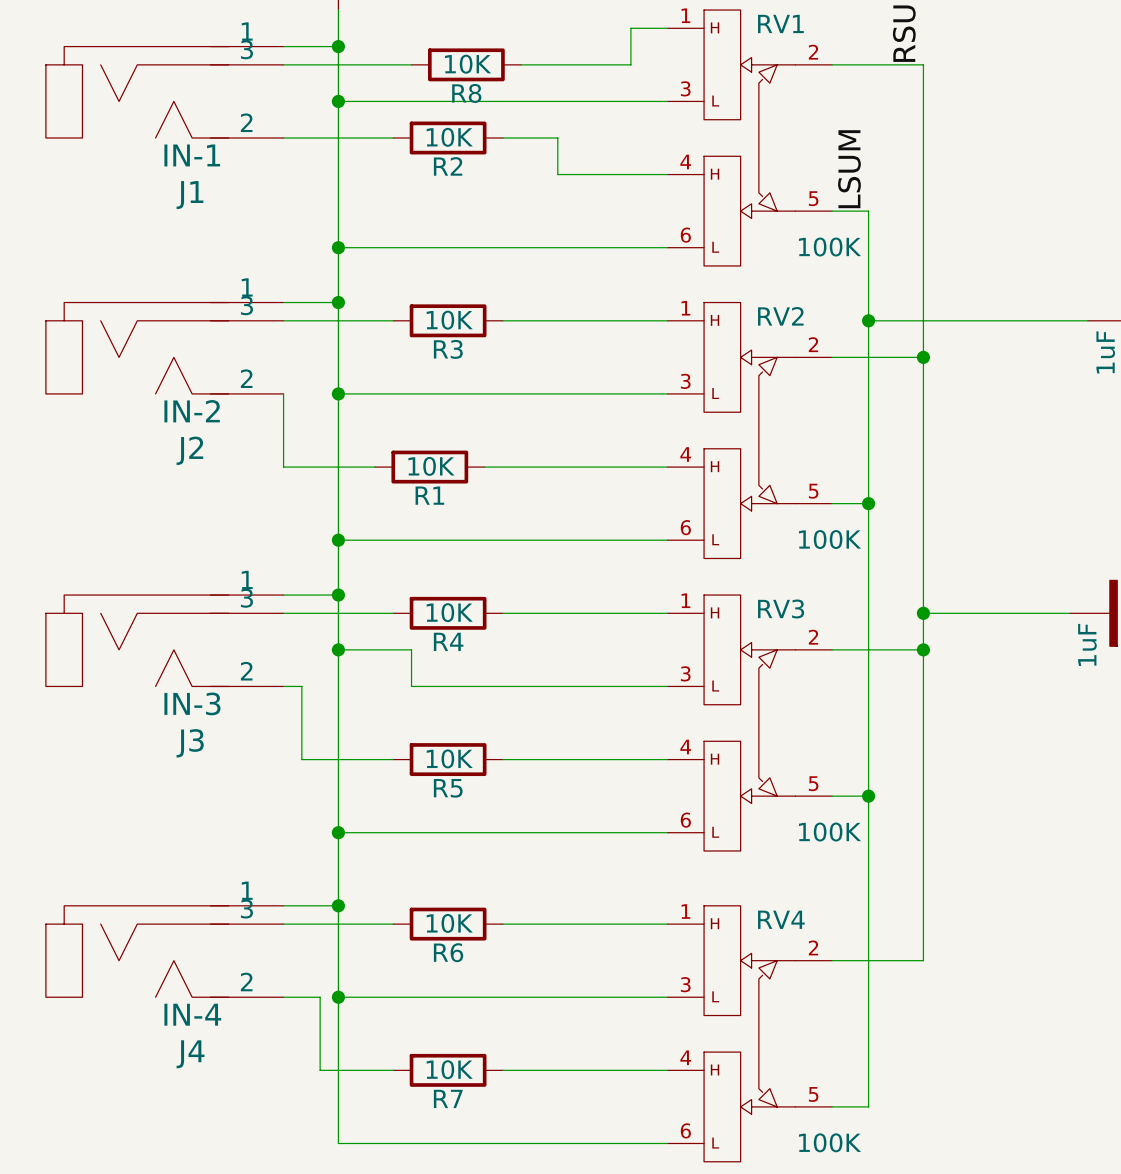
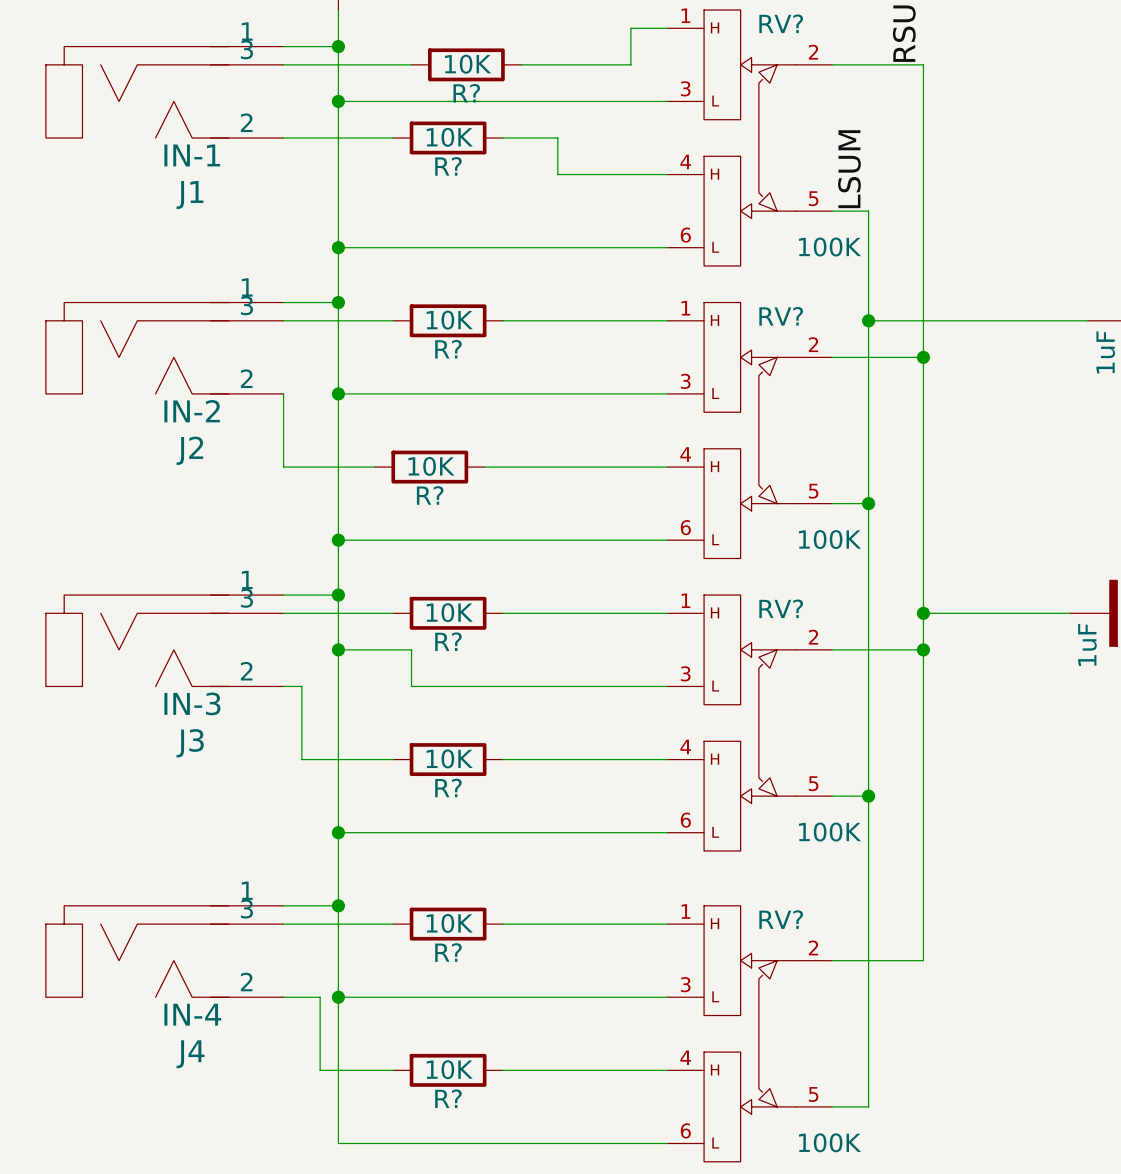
RV1 name: RV1 (780, 23) -> RV? (781, 23)
R8 name: R8 (466, 93) -> R? (466, 93)
R2 name: R2 (448, 166) -> R? (448, 166)
RV2 name: RV2 (780, 316) -> RV? (781, 316)
R3 name: R3 (448, 349) -> R? (448, 349)
R1 name: R1 (429, 495) -> R? (430, 495)
RV3 name: RV3 (781, 608) -> RV? (781, 608)
R4 name: R4 (448, 641) -> R? (448, 641)
R5 name: R5 (448, 788) -> R? (448, 787)
RV4 name: RV4 (781, 919) -> RV? (781, 919)
R6 name: R6 (448, 952) -> R? (448, 952)
R7 name: R7 (448, 1098) -> R? (448, 1098)

